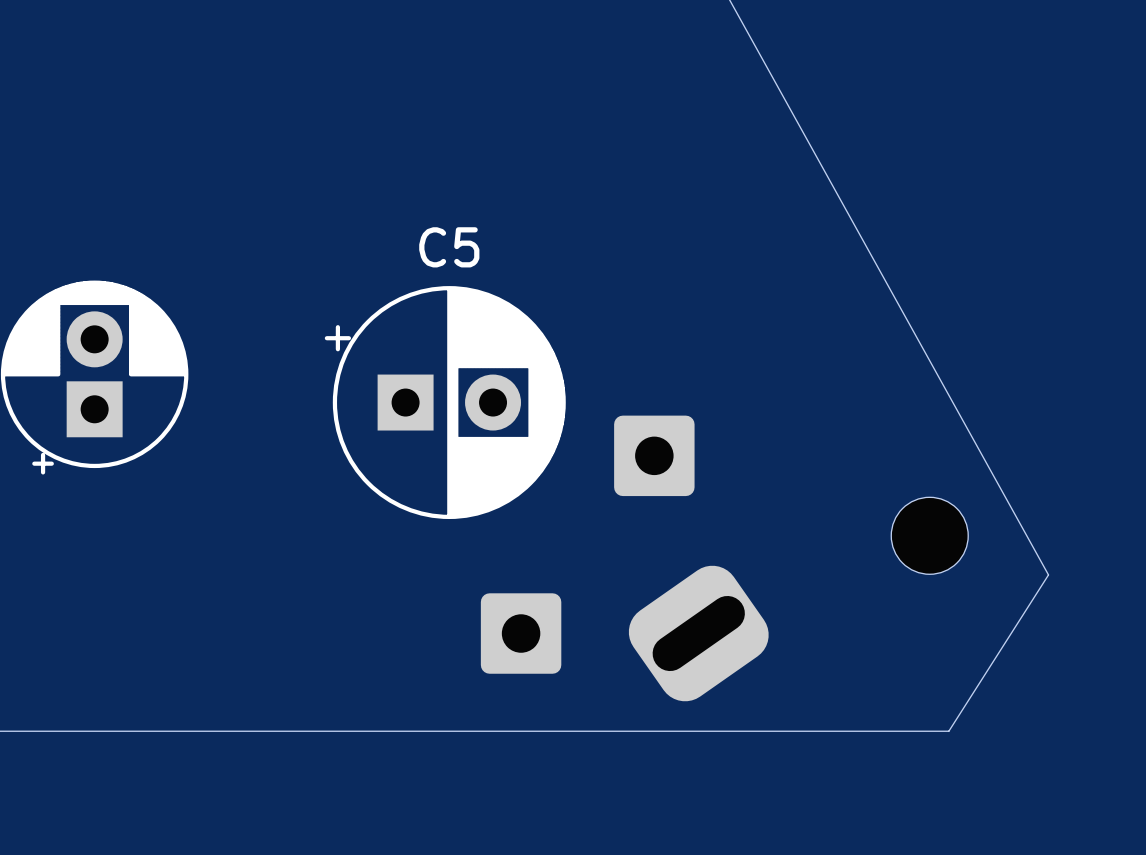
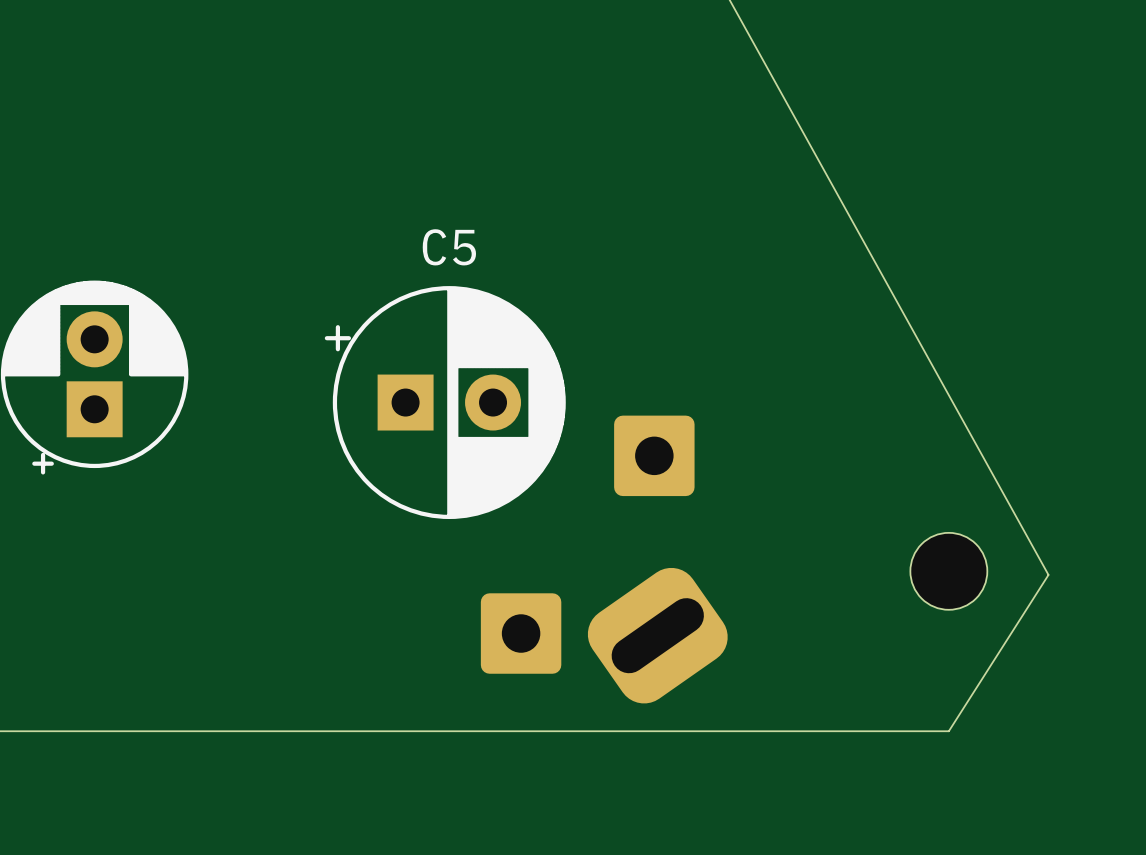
part position: (929, 535) -> (948, 571)
part: (698, 633) -> none
part: none -> (657, 635)

